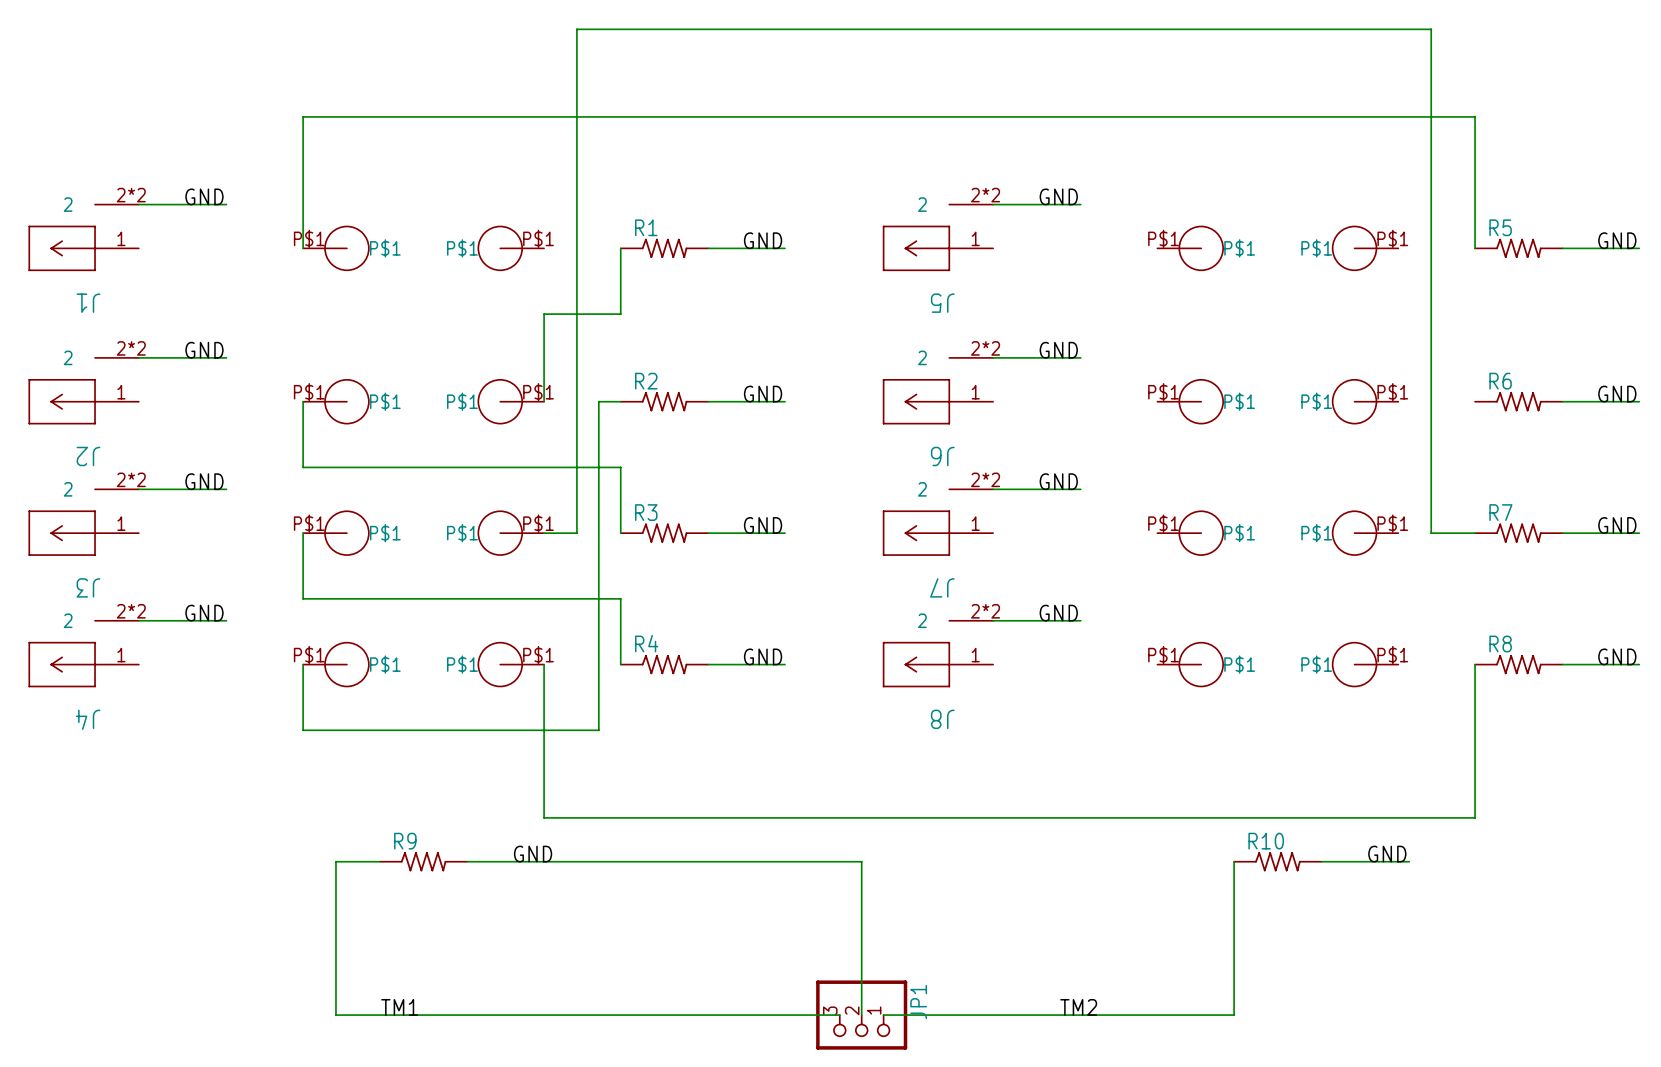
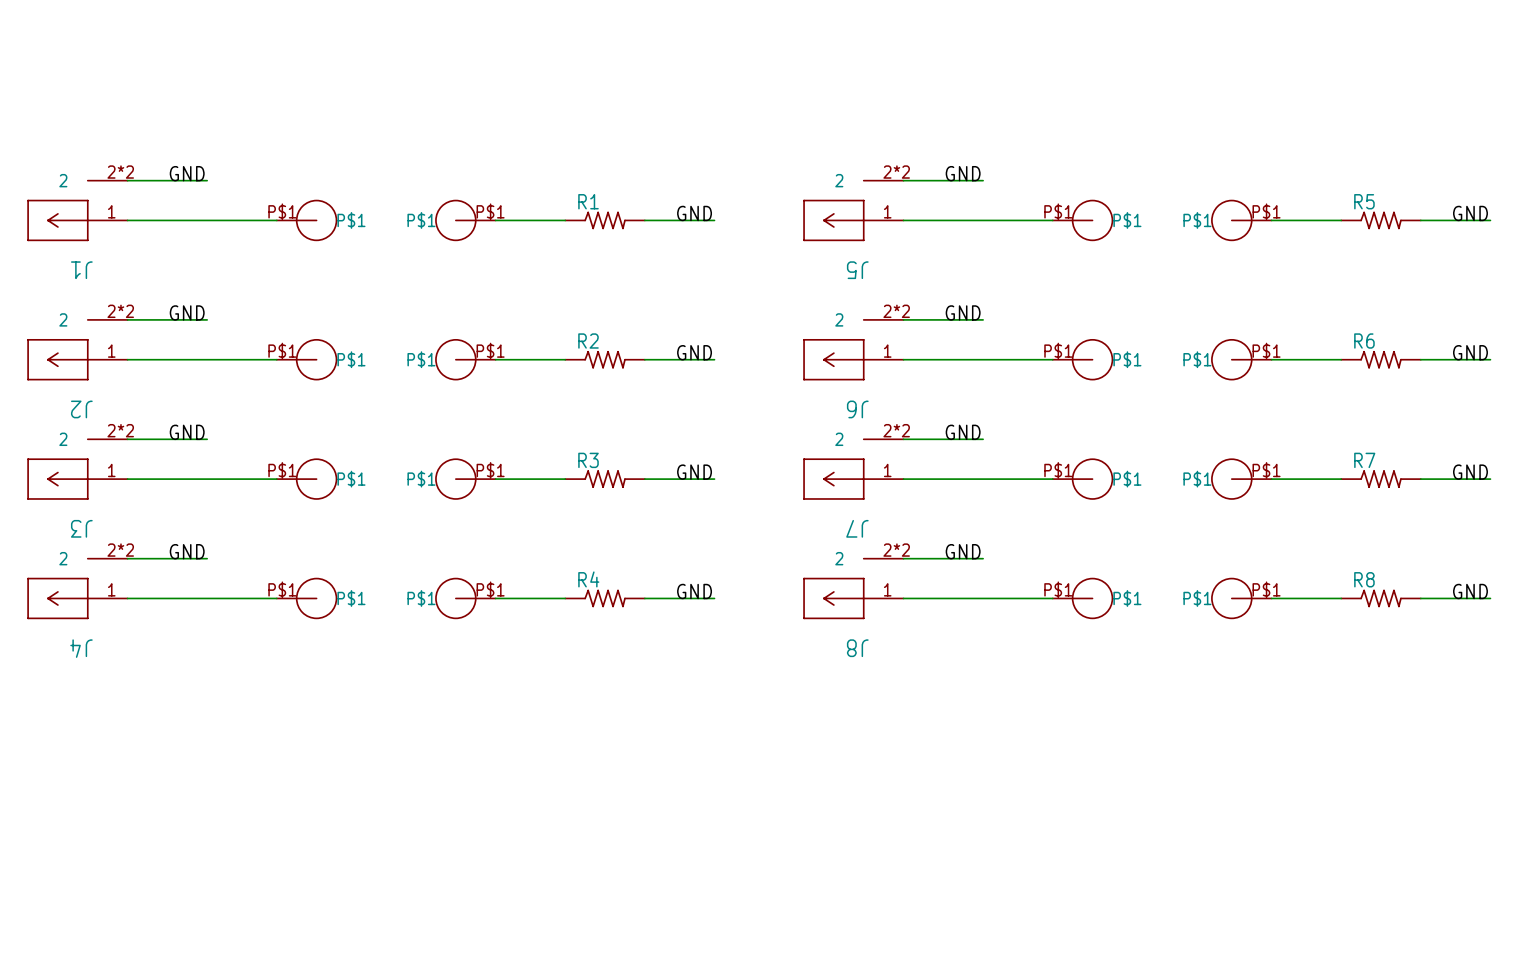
wire: none -> (127, 220) (276, 220)
wire: (303, 248) (303, 116) (1475, 116) (1475, 248) -> (1271, 220) (1341, 220)
wire: (620, 248) (620, 314) (544, 314) (544, 401) -> (565, 220) (495, 220)
wire: none -> (903, 220) (1052, 220)
wire: none -> (127, 359) (276, 359)
wire: (303, 401) (303, 467) (620, 467) (620, 533) -> (525, 479) (565, 479)
wire: (598, 401) (598, 730) (303, 730) (303, 664) -> (545, 359) (495, 359)
wire: none -> (903, 359) (1052, 359)
wire: none -> (1271, 359) (1341, 359)
wire: none -> (127, 479) (276, 479)
wire: (303, 533) (303, 598) (620, 598) (620, 664) -> (495, 598) (565, 598)
wire: (576, 533) (576, 29) (1431, 29) (1431, 533) -> (1271, 479) (1301, 479)
wire: none -> (903, 479) (1052, 479)
wire: none -> (127, 598) (276, 598)
wire: (544, 664) (544, 817) (1475, 817) (1475, 664) -> (1271, 598) (1341, 598)
wire: none -> (903, 598) (1052, 598)
label: GND (533, 854) -> none
label: GND (1387, 854) -> none
wire: (379, 861) (335, 861) (335, 1015) (839, 1015) -> none
R9: (423, 861) -> none
wire: (467, 861) (861, 861) (861, 1015) -> none
wire: (1234, 861) (1234, 1015) (883, 1015) -> none
R10: (1277, 861) -> none
wire: (1321, 861) (1409, 861) -> none
label: TM1 (399, 1007) -> none
label: TM2 (1078, 1007) -> none
JP1: (861, 1015) -> none

